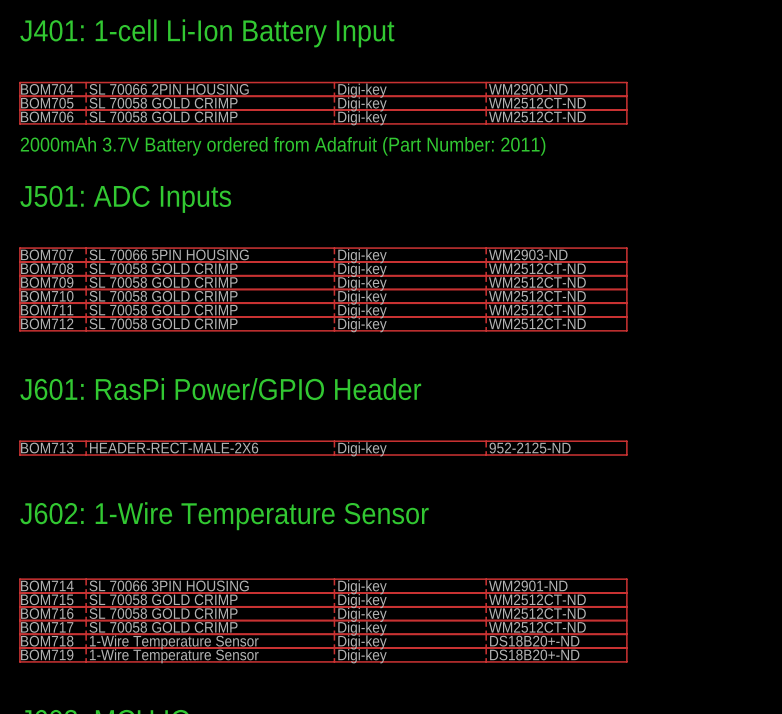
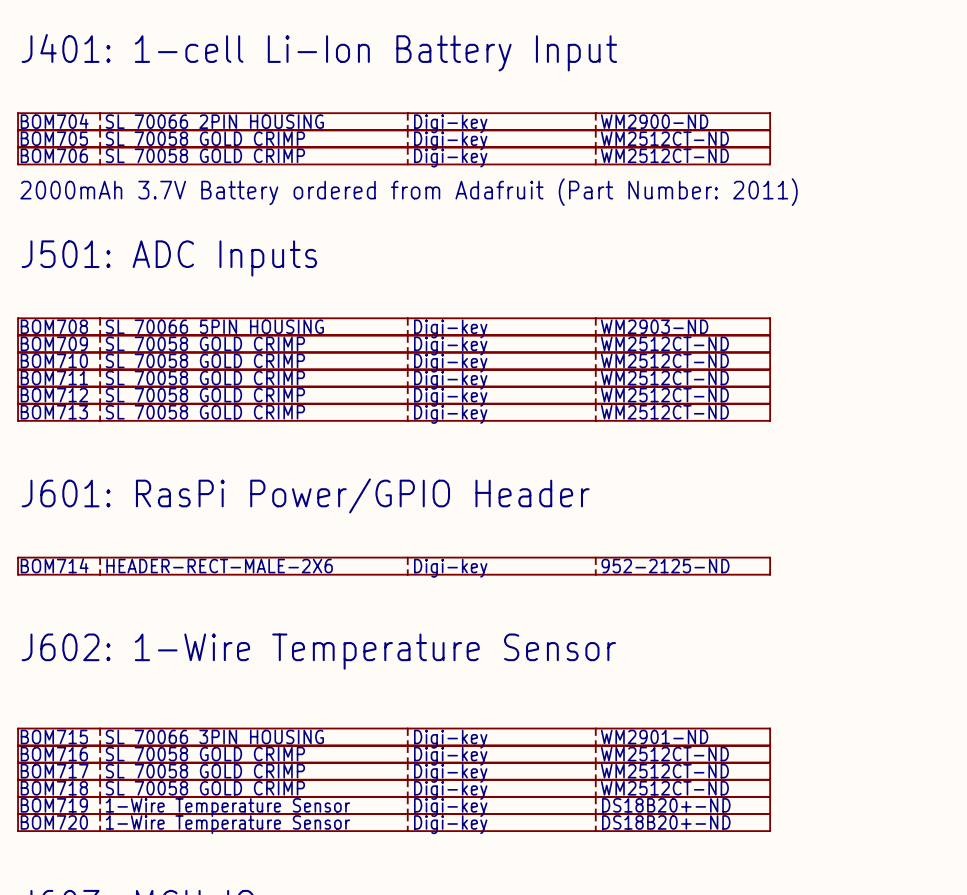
BOM707 name: BOM707 (47, 254) -> BOM708 (54, 326)
BOM708 name: BOM708 (47, 268) -> BOM709 (54, 343)
BOM709 name: BOM709 (47, 282) -> BOM710 (54, 360)
BOM710 name: BOM710 (47, 296) -> BOM711 (54, 378)
BOM711 name: BOM711 (47, 310) -> BOM712 (54, 395)
BOM712 name: BOM712 (47, 323) -> BOM713 (54, 412)
BOM713 name: BOM713 (47, 448) -> BOM714 (54, 565)
BOM714 name: BOM714 (47, 585) -> BOM715 (54, 736)
BOM715 name: BOM715 (47, 599) -> BOM716 (54, 754)
BOM716 name: BOM716 (47, 613) -> BOM717 (54, 771)
BOM717 name: BOM717 (47, 627) -> BOM718 (54, 788)
BOM718 name: BOM718 (47, 641) -> BOM719 (54, 805)
BOM719 name: BOM719 (47, 654) -> BOM720 (54, 822)

